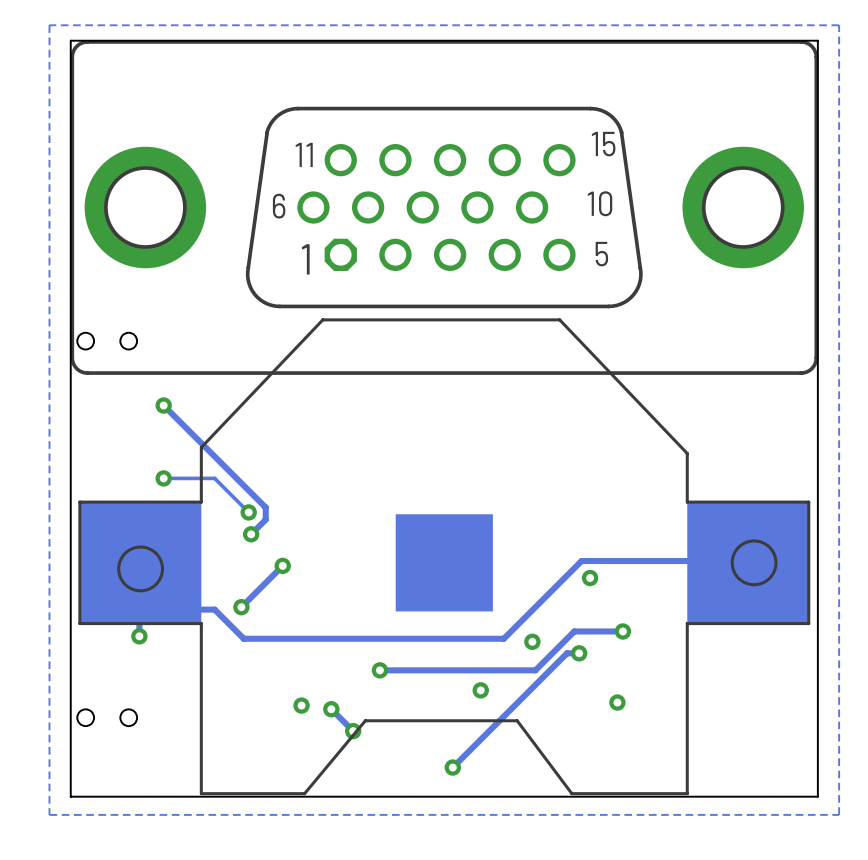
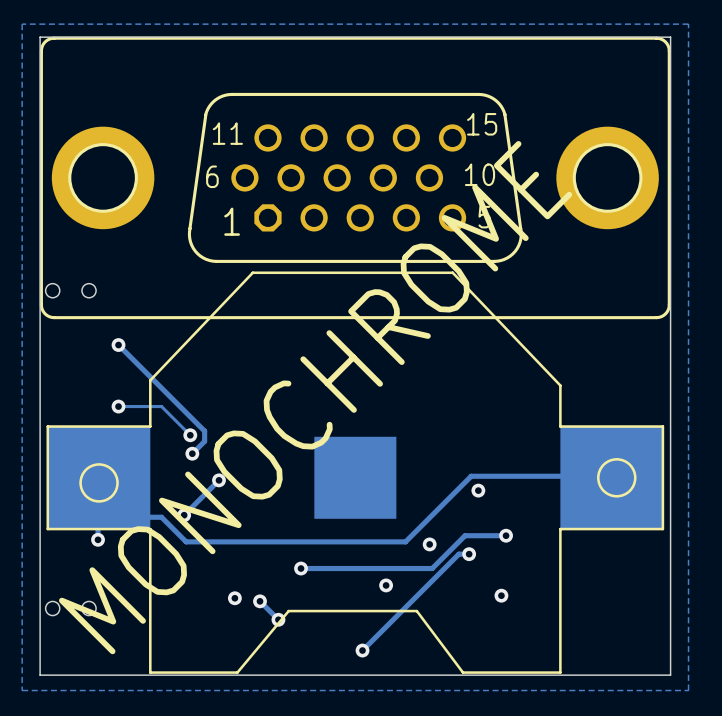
text: none -> MONOCHROME (315, 397)

